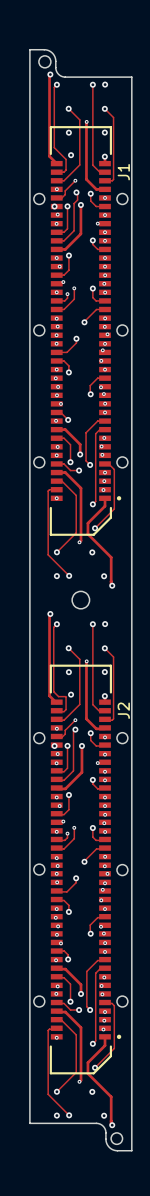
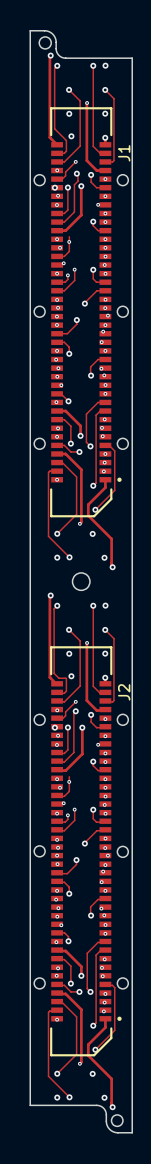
via: (68, 255) -> none
via: none -> (69, 241)
via: (68, 795) -> none
via: none -> (69, 781)

